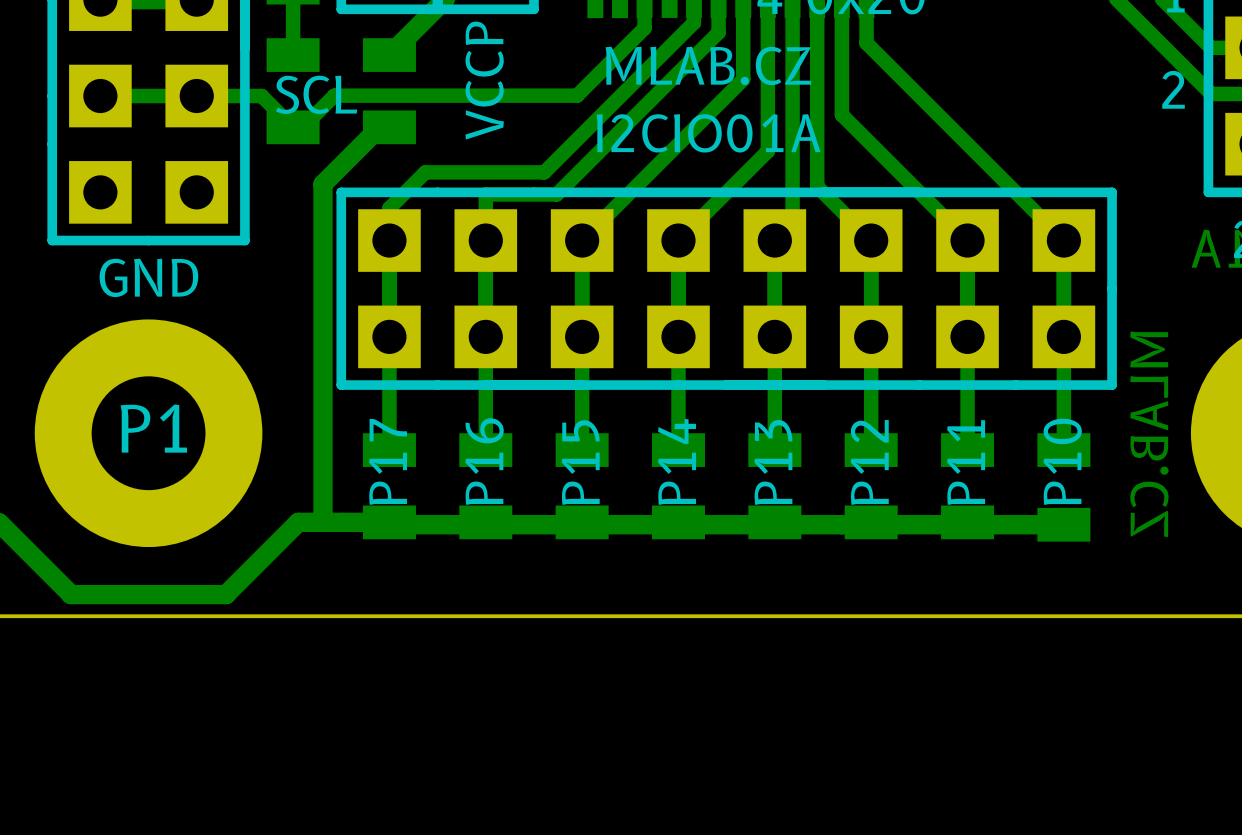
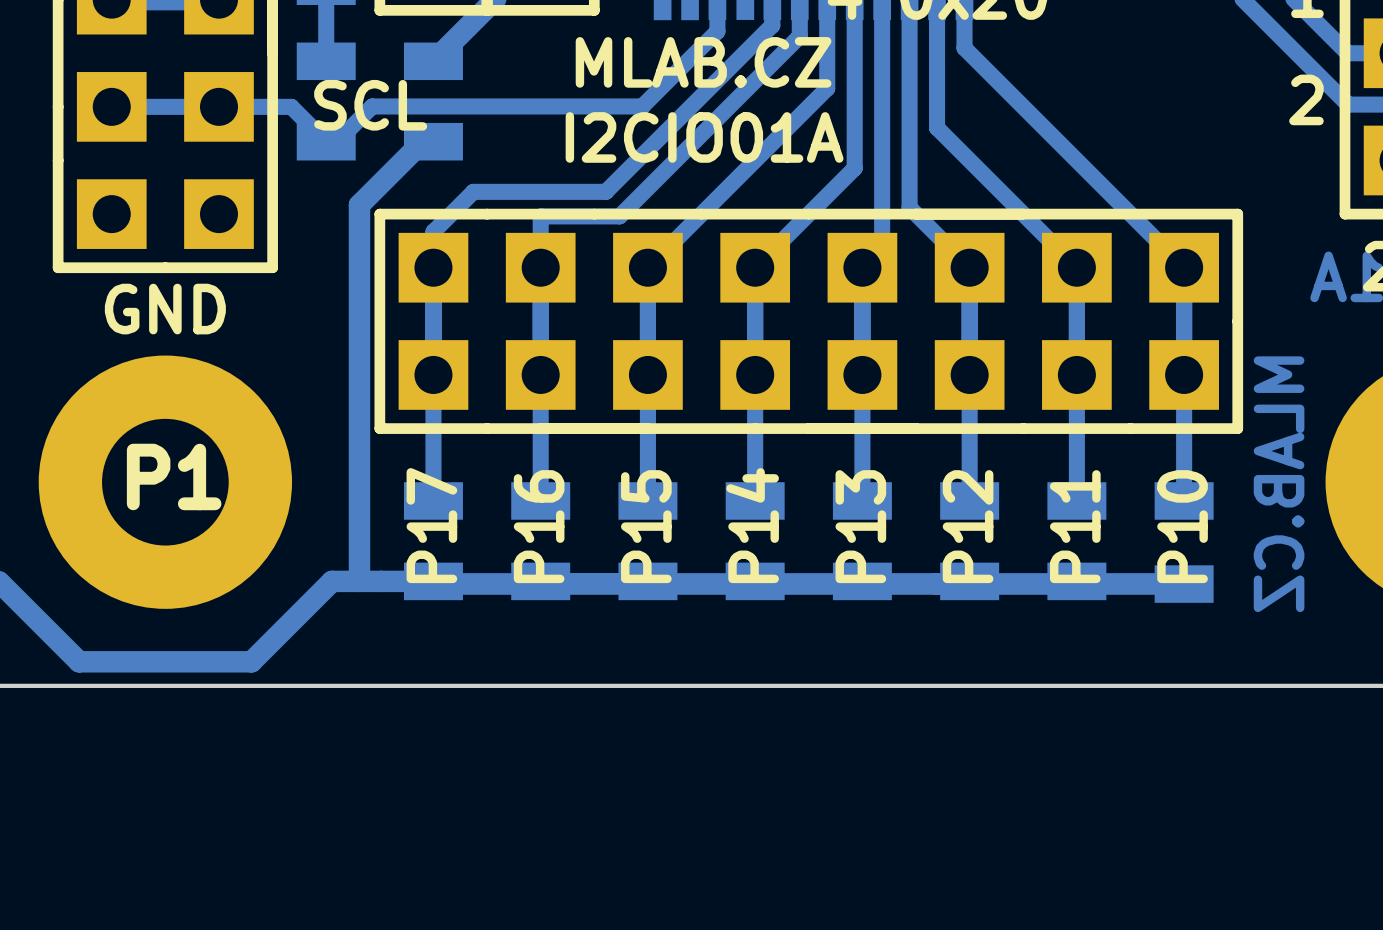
text position: MLAB.CZ (708, 65) -> MLAB.CZ (703, 62)
text: VCCP (484, 80) -> none
text position: I2CIO01A (708, 133) -> I2CIO01A (704, 137)

